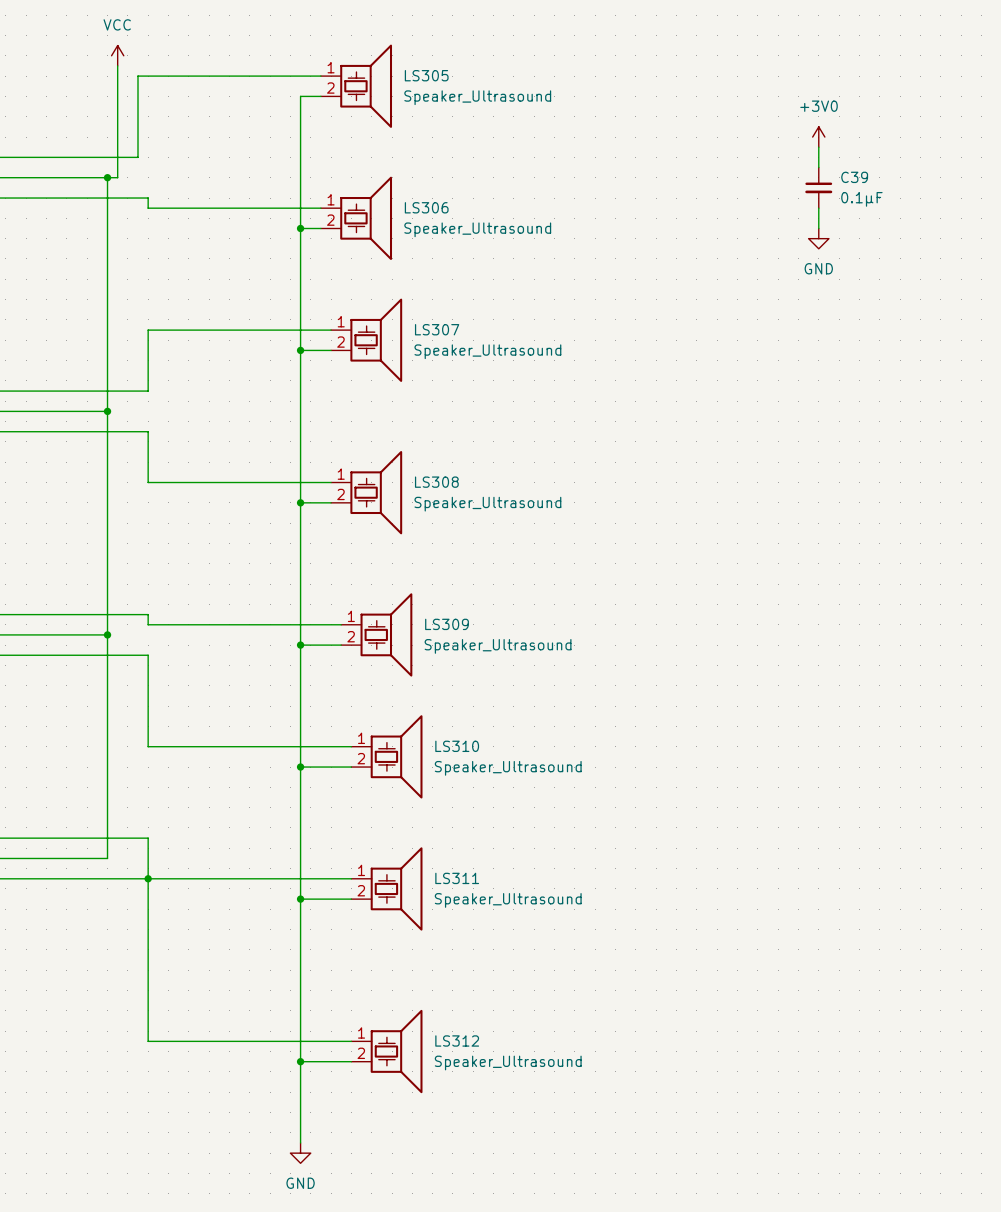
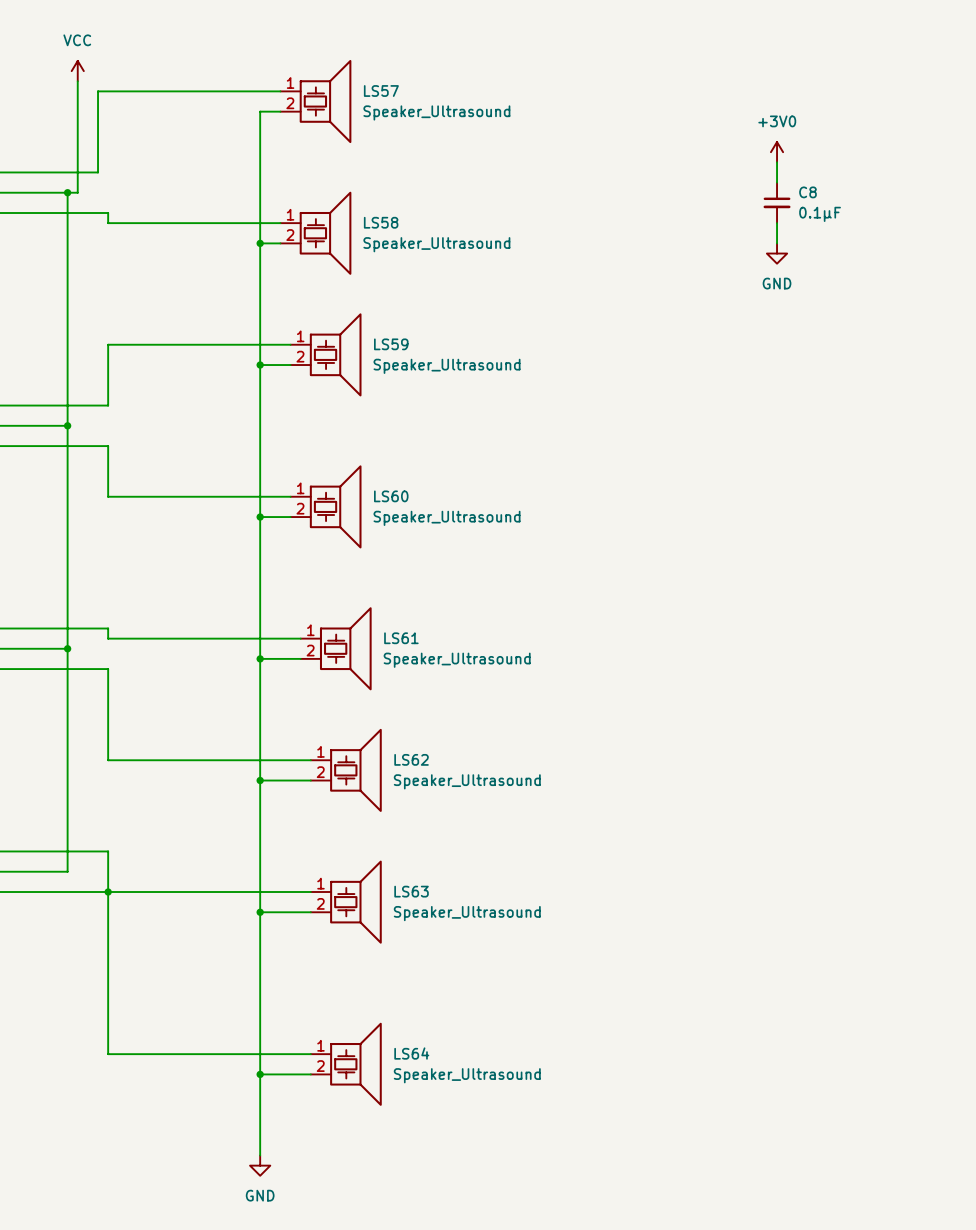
LS305 name: LS305 (426, 75) -> LS57 (381, 91)
C39 name: C39 (854, 177) -> C8 (807, 192)
LS306 name: LS306 (426, 207) -> LS58 (381, 222)
LS307 name: LS307 (437, 329) -> LS59 (391, 344)
LS308 name: LS308 (436, 482) -> LS60 (391, 496)
LS309 name: LS309 (447, 624) -> LS61 (401, 638)
LS310 name: LS310 (457, 746) -> LS62 (411, 759)
LS311 name: LS311 (457, 878) -> LS63 (411, 891)
LS312 name: LS312 (457, 1040) -> LS64 (411, 1053)

